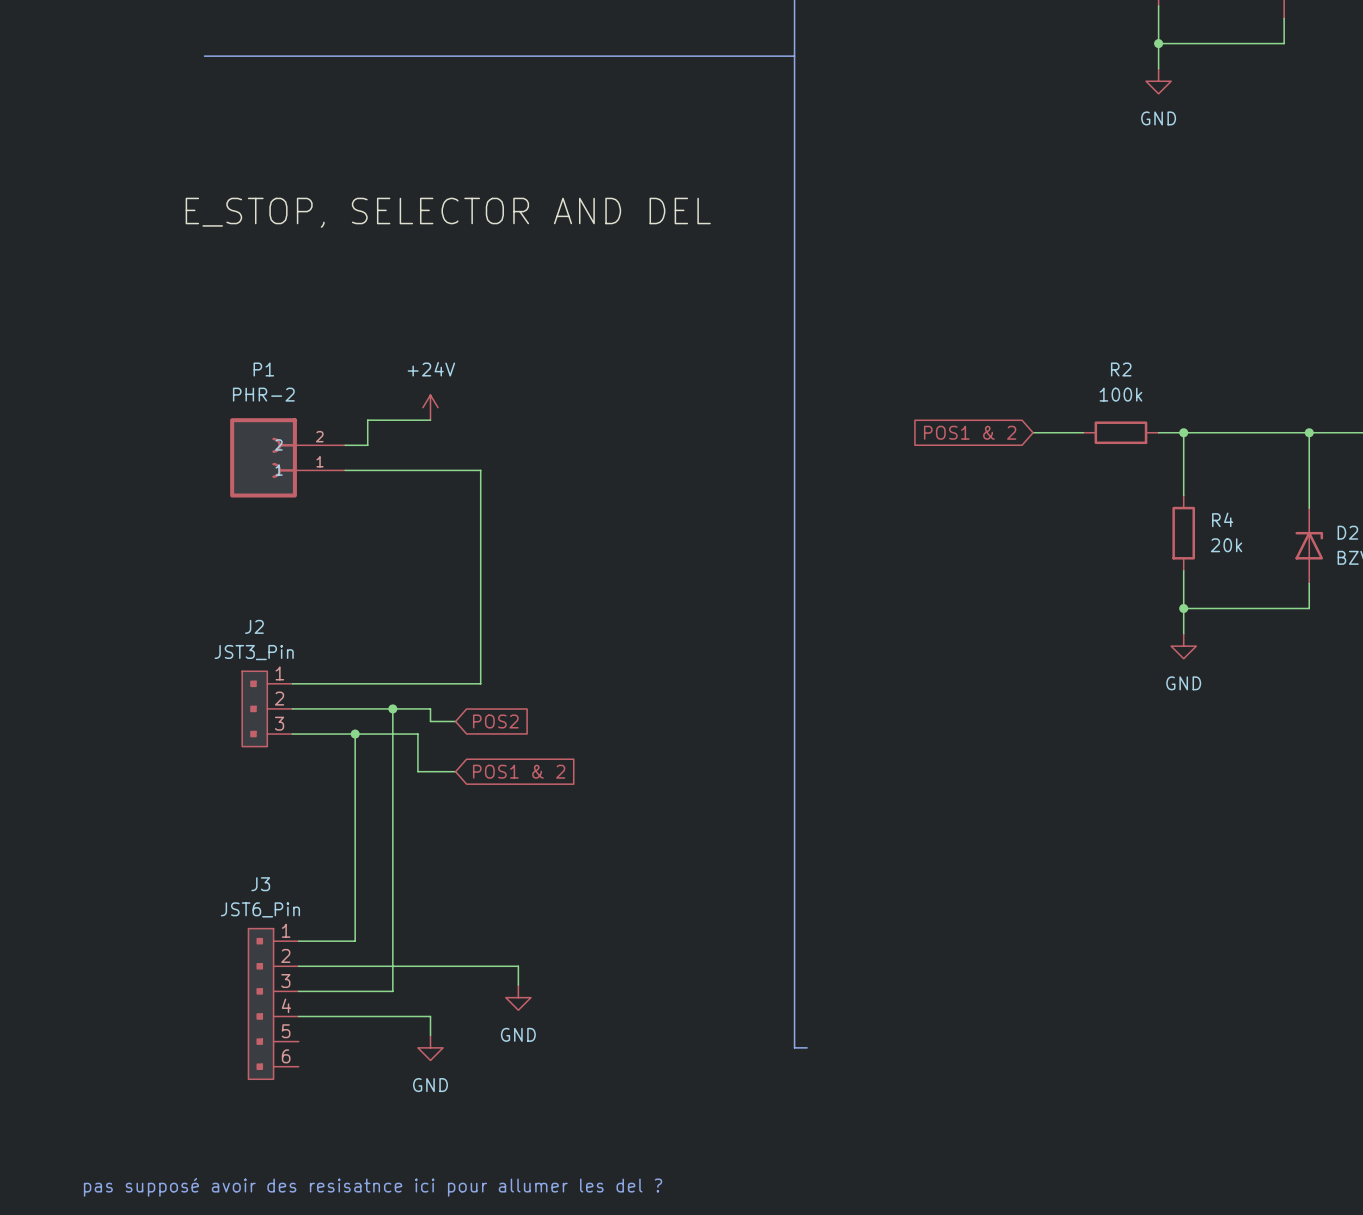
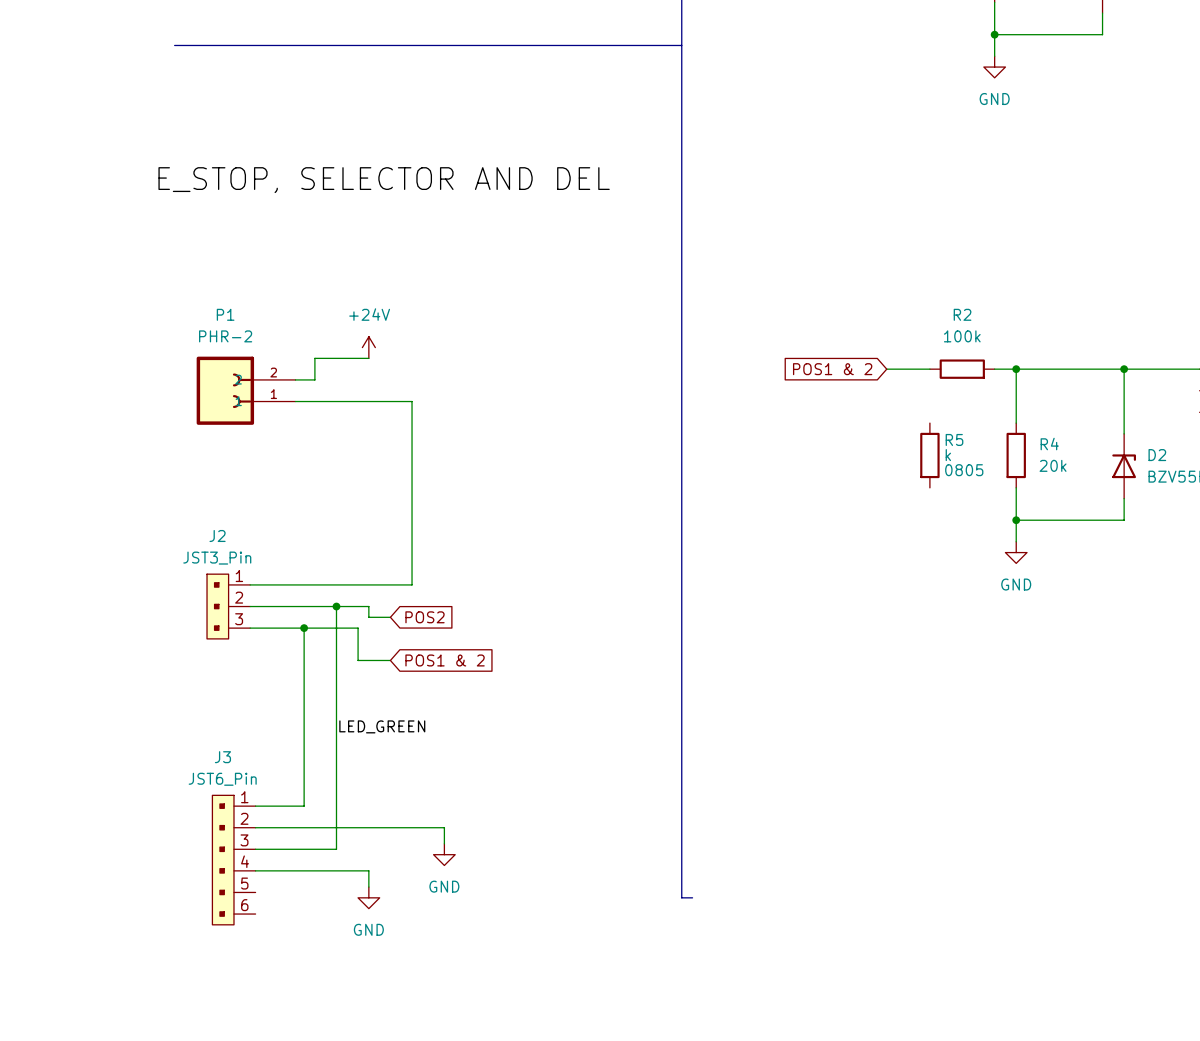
R5: none -> k (929, 455)
label: none -> LED_GREEN (382, 726)
text: pas supposé avoir des resisatnce ici pour allumer les del ? (373, 1187) -> none

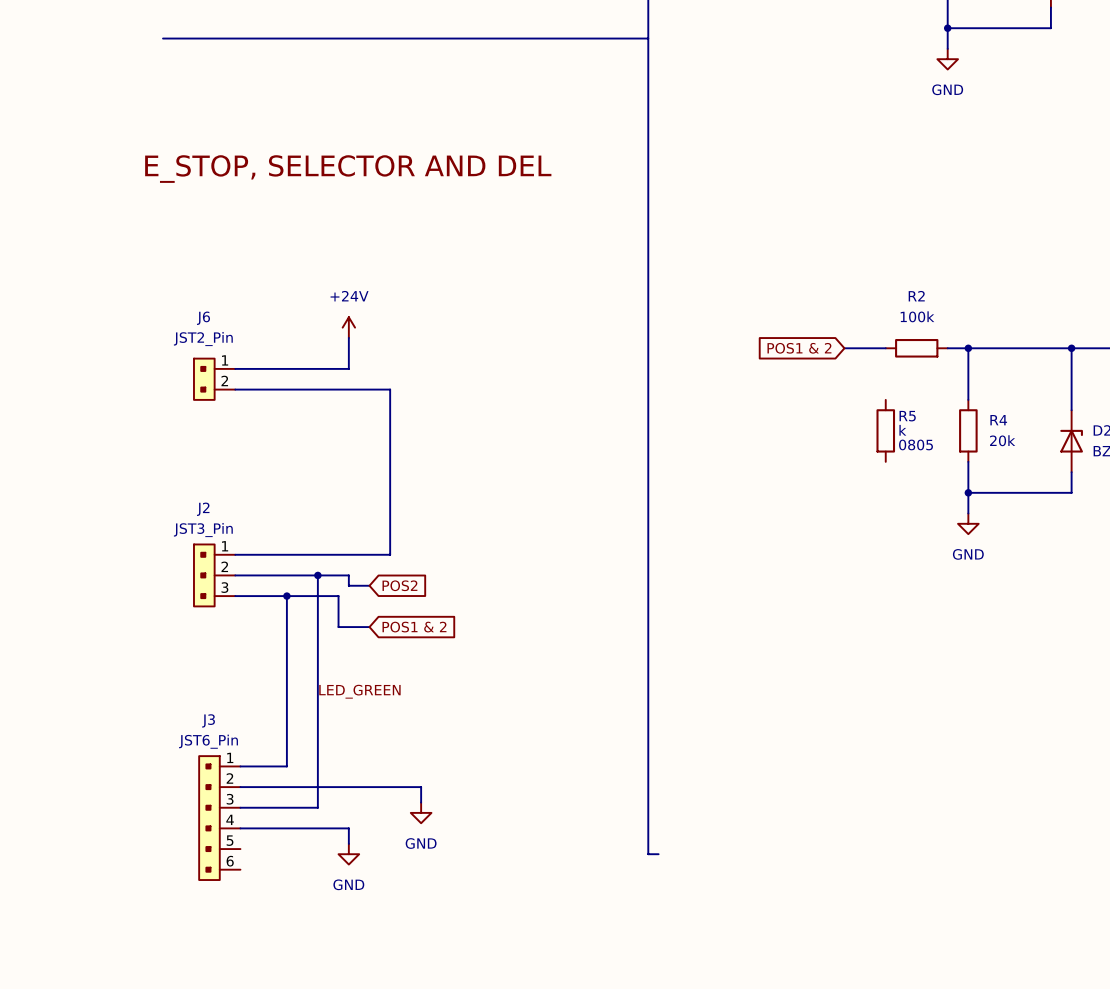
wire: (368, 358) (314, 358) (314, 379) (295, 379) -> (348, 337) (348, 368) (235, 368)
P1: PHR-2 (246, 390) -> none
J6: none -> JST2_Pin (214, 379)
wire: (295, 401) (412, 401) (412, 412) -> (235, 389) (390, 389)

